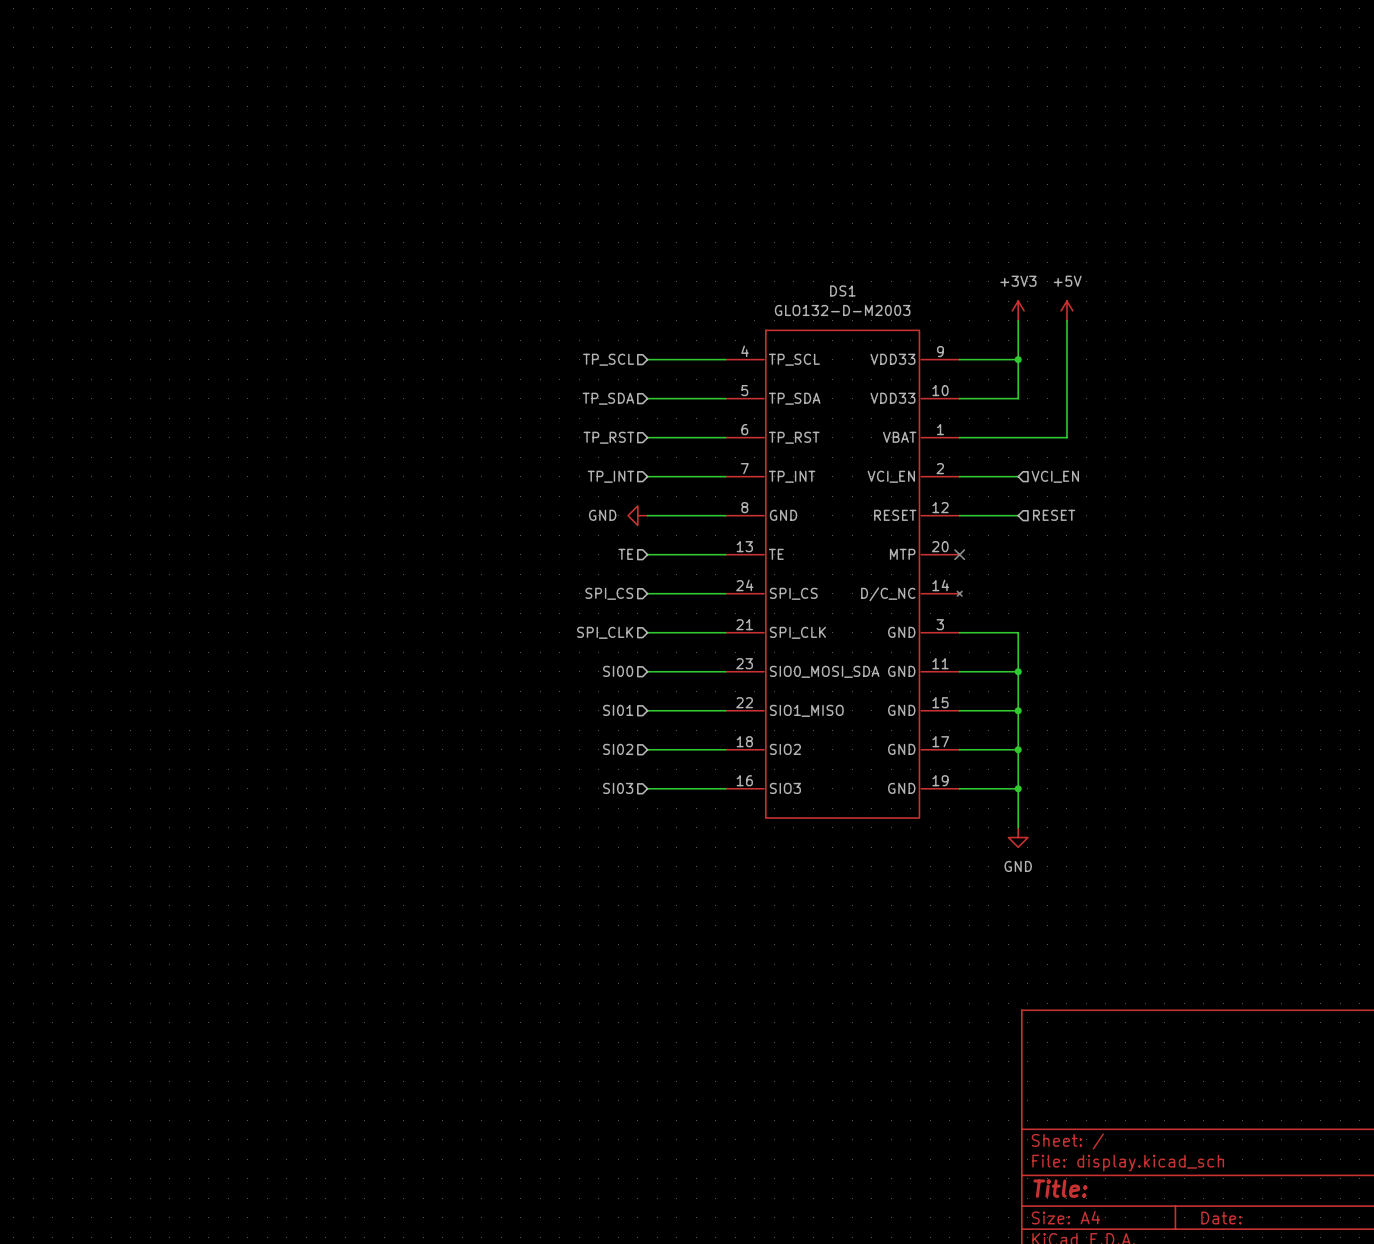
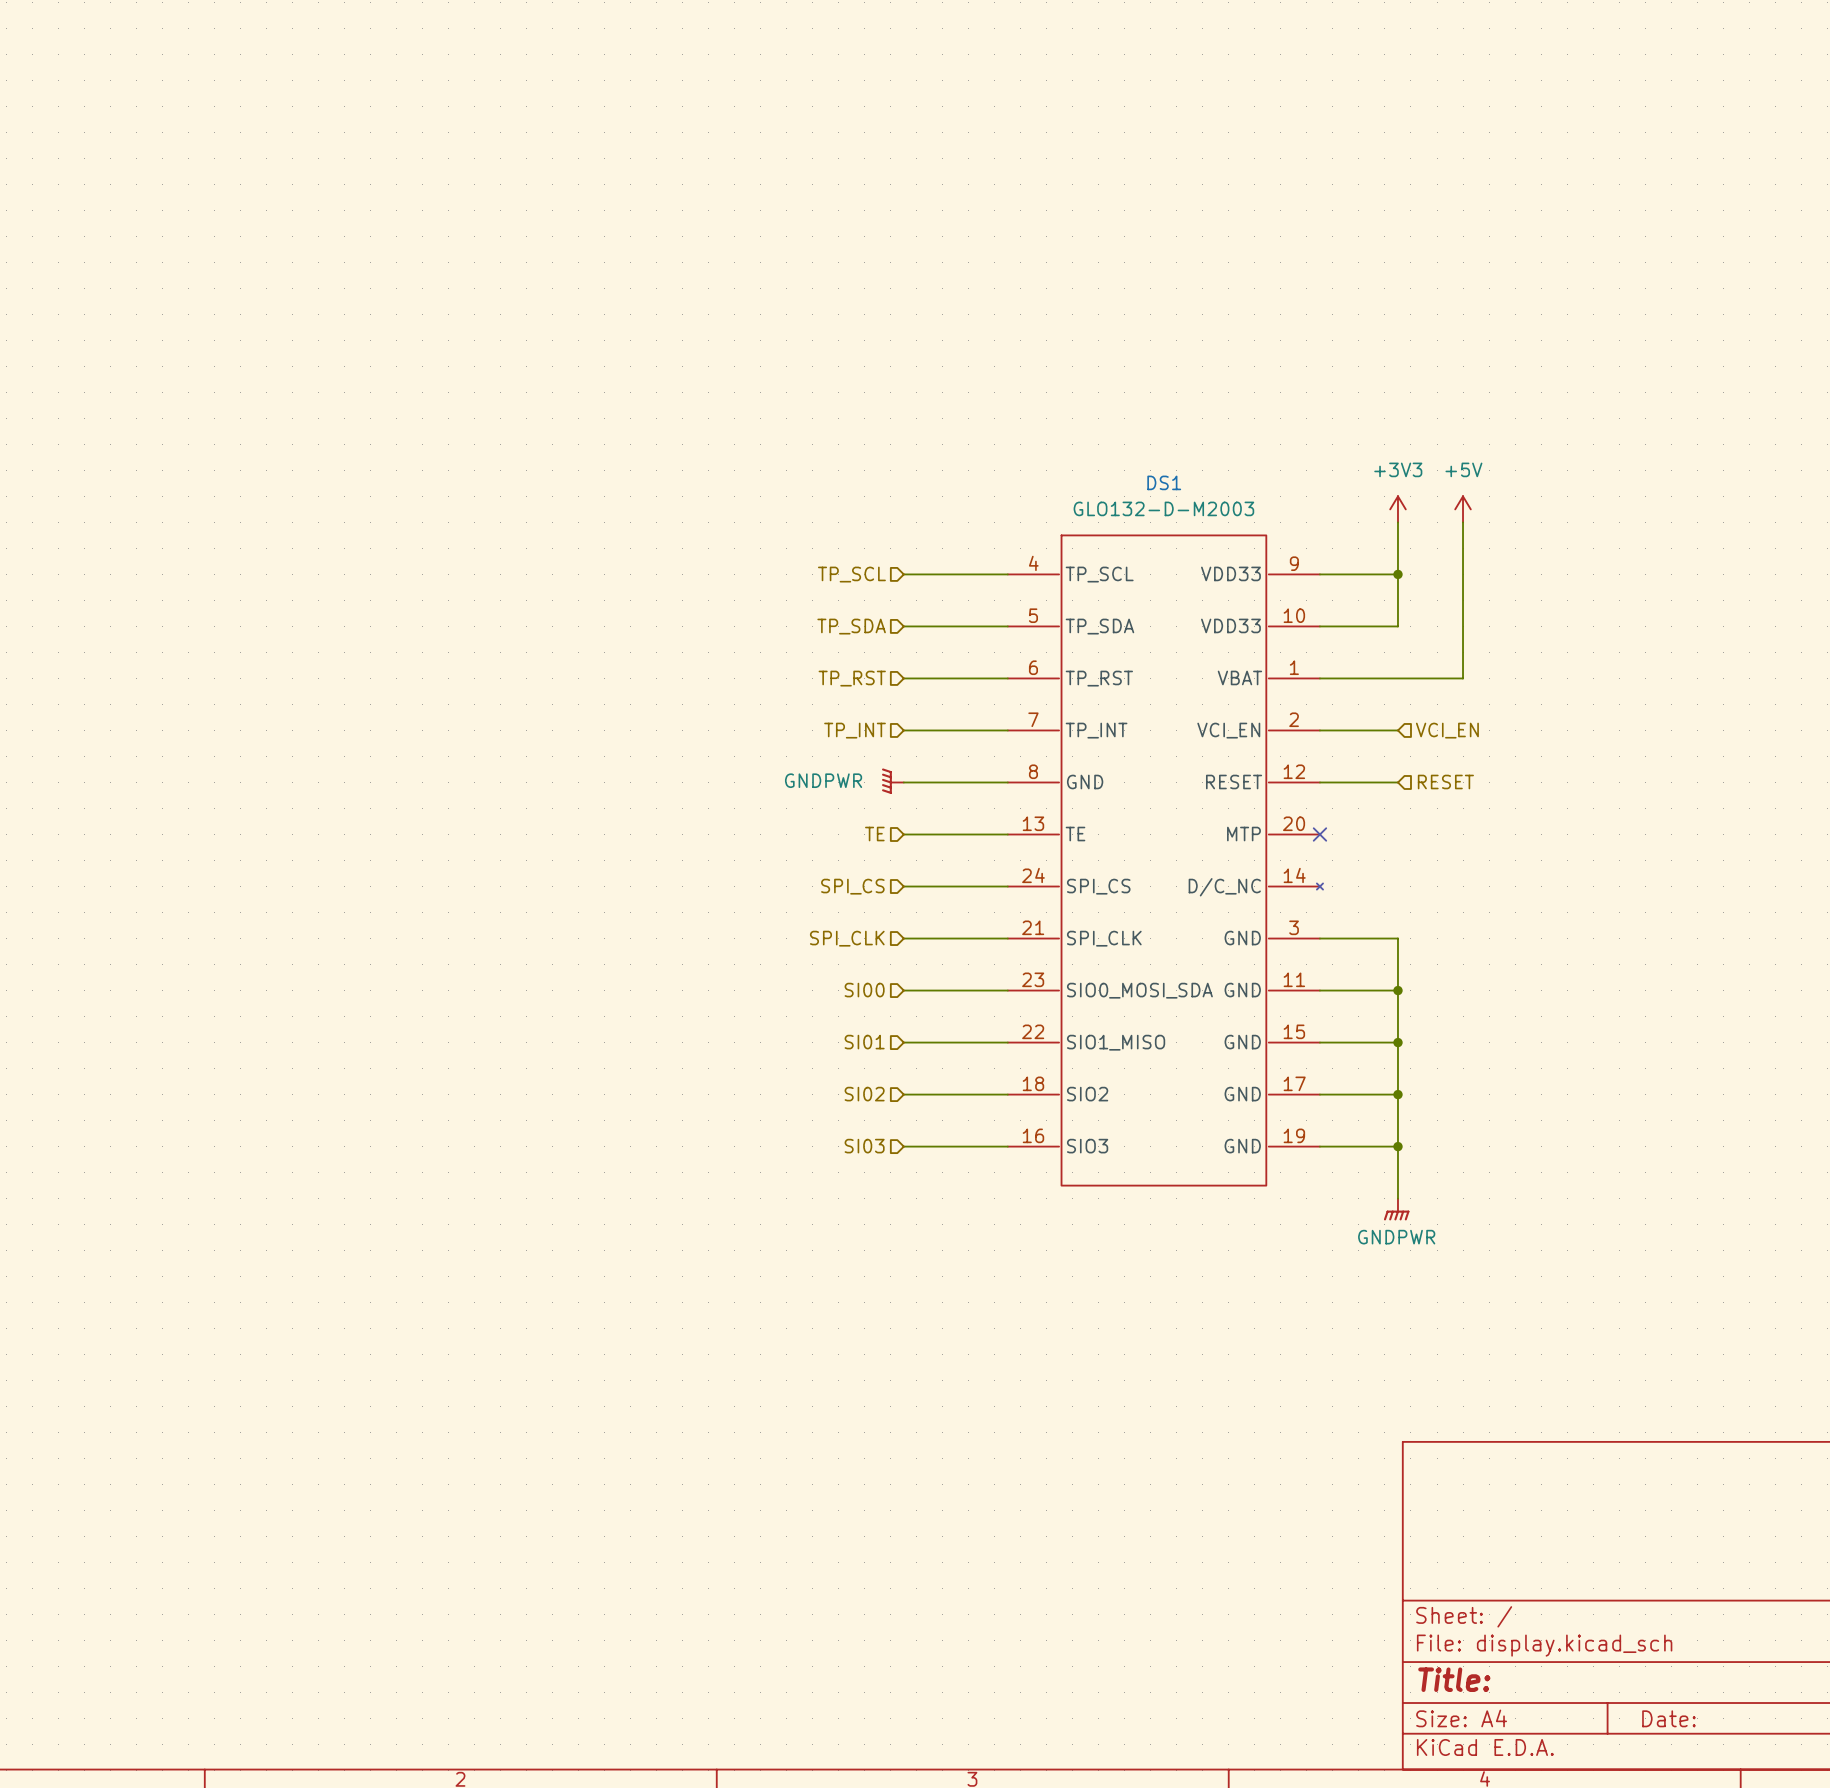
power symbol: GND (637, 515) -> GNDPWR (892, 781)
power symbol: GND (1018, 837) -> GNDPWR (1396, 1209)

